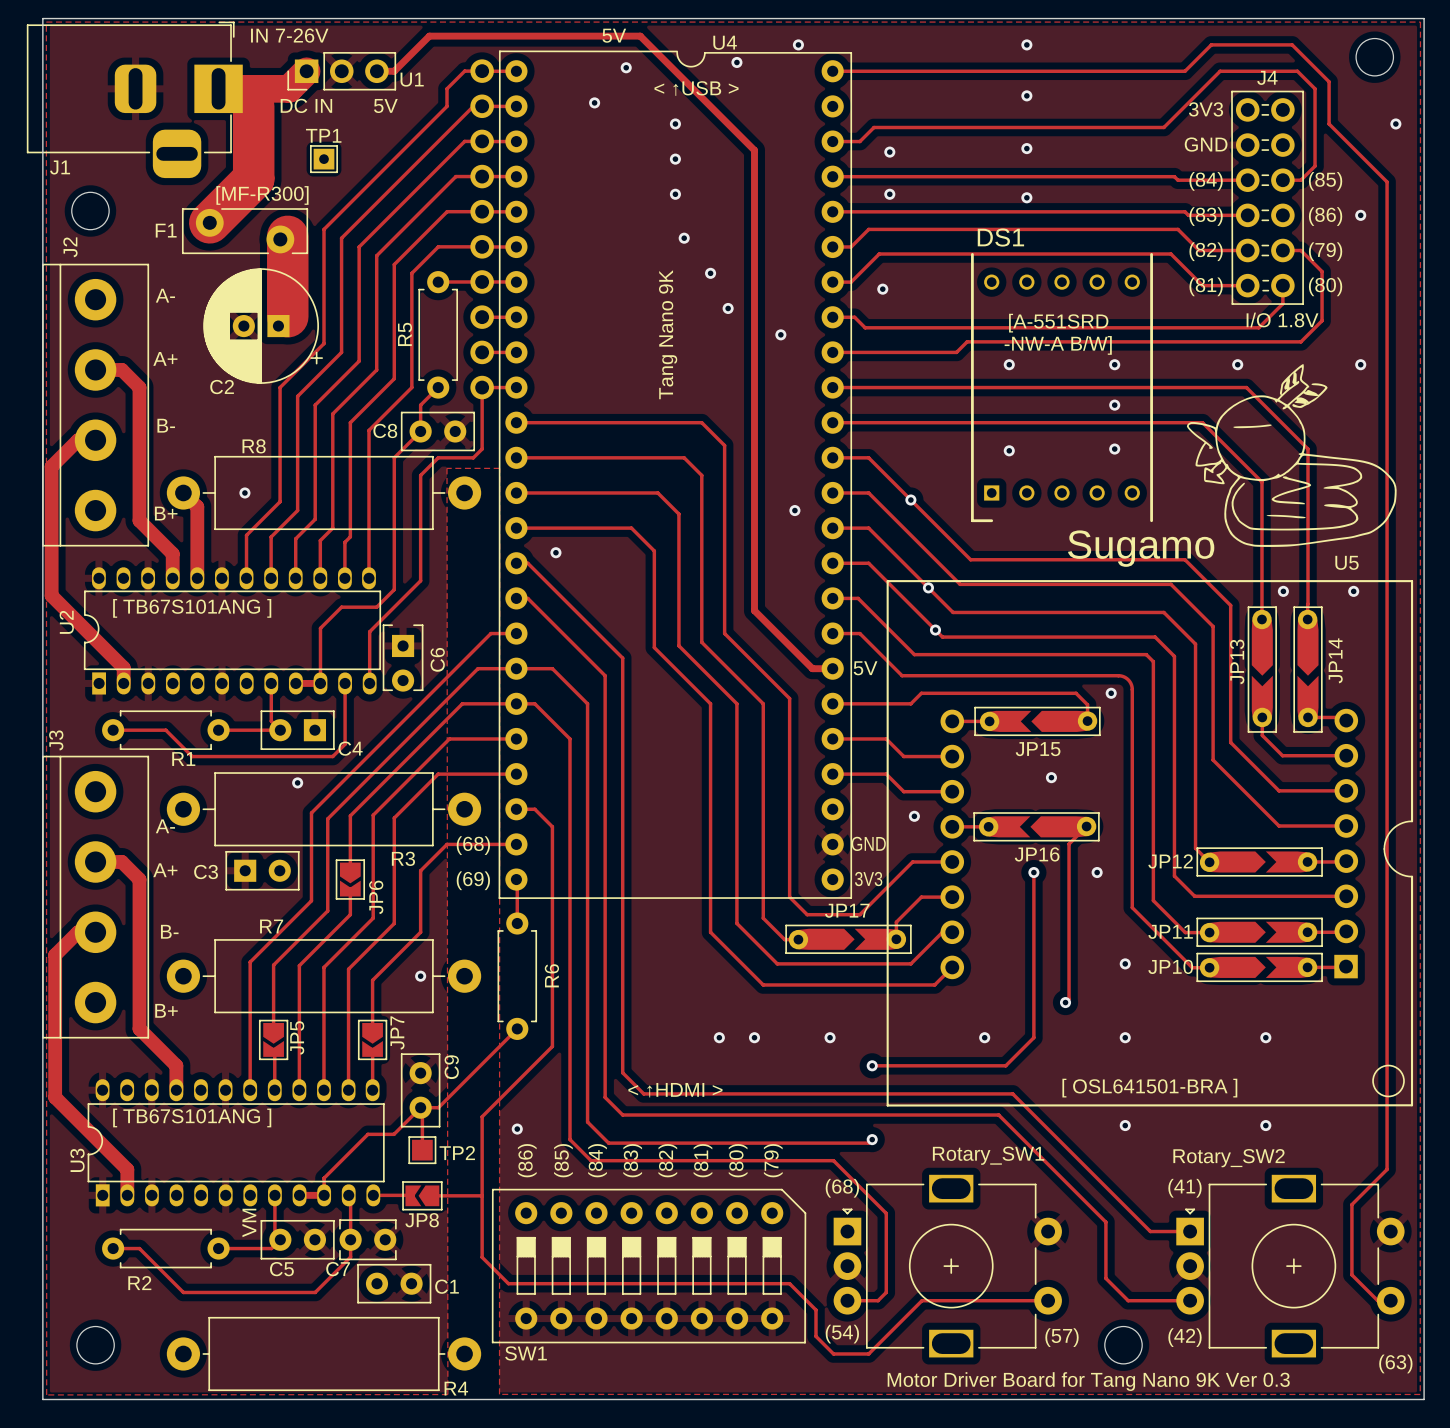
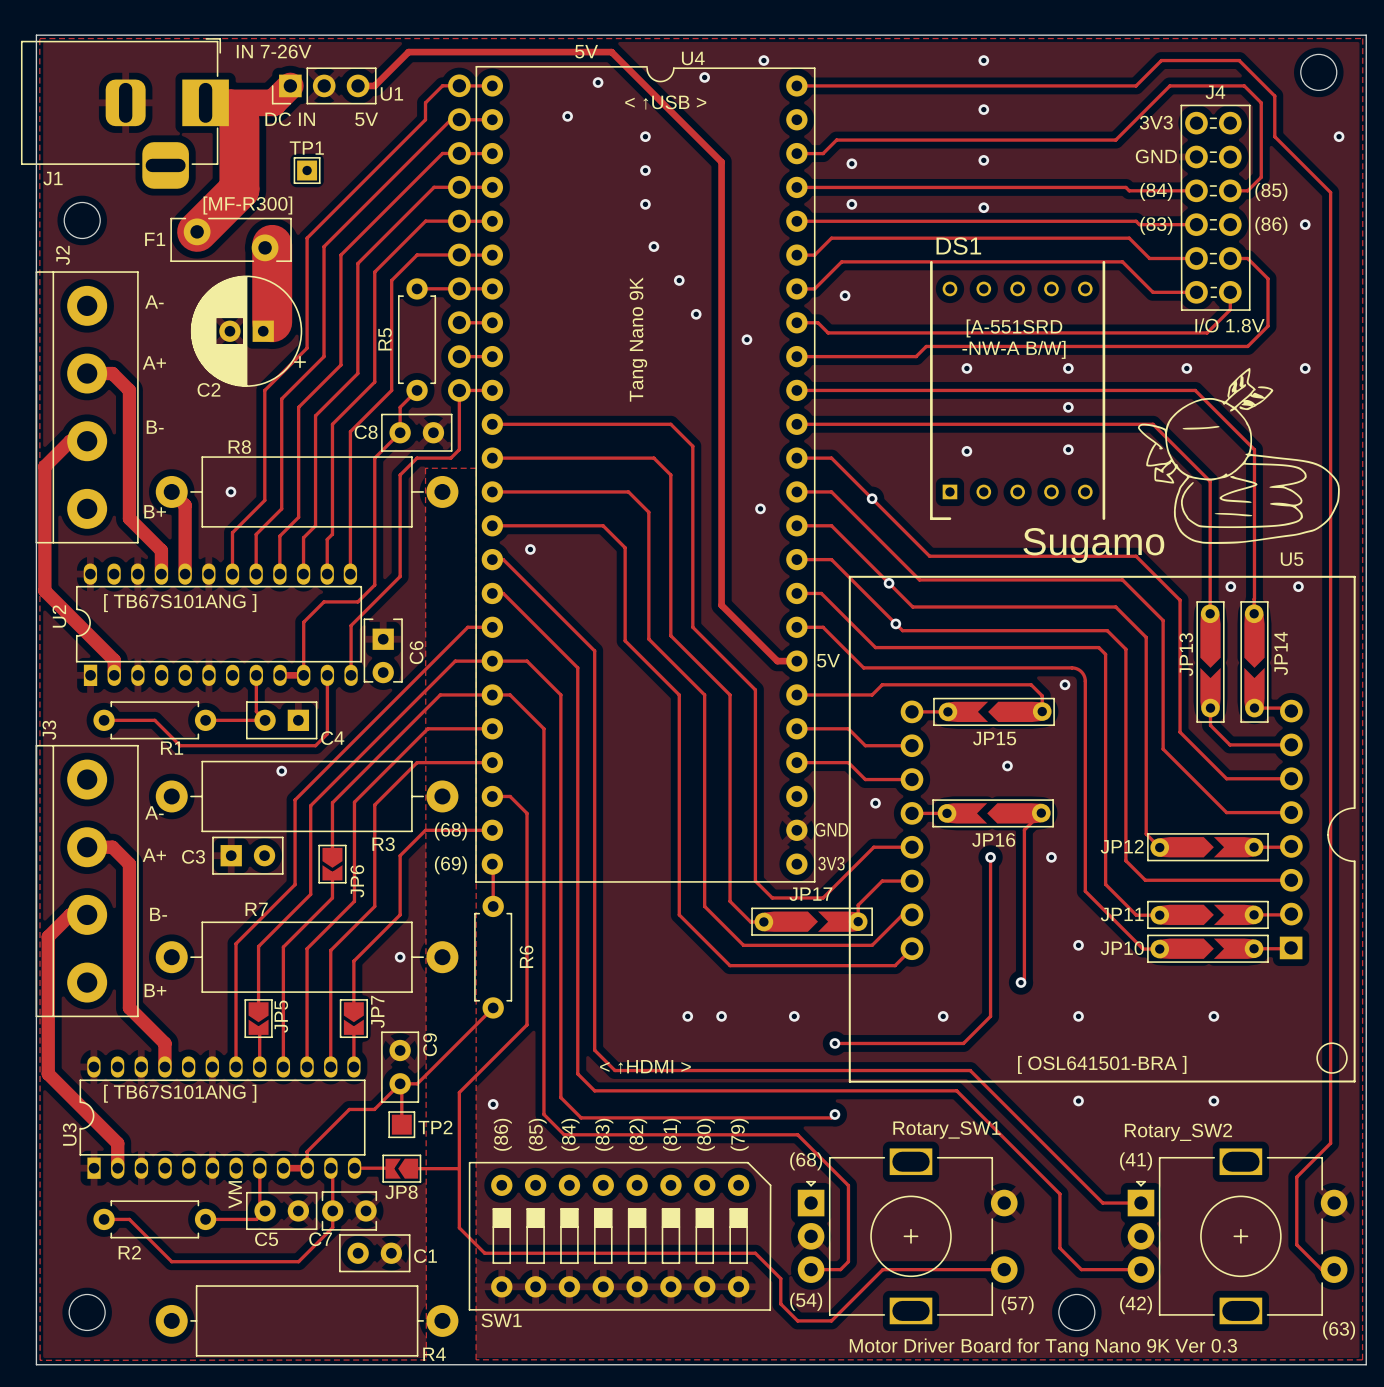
text: (82) (1206, 251) -> none
text: (79) (1325, 251) -> none
text: (81) (1206, 286) -> none
text: (80) (1325, 286) -> none

